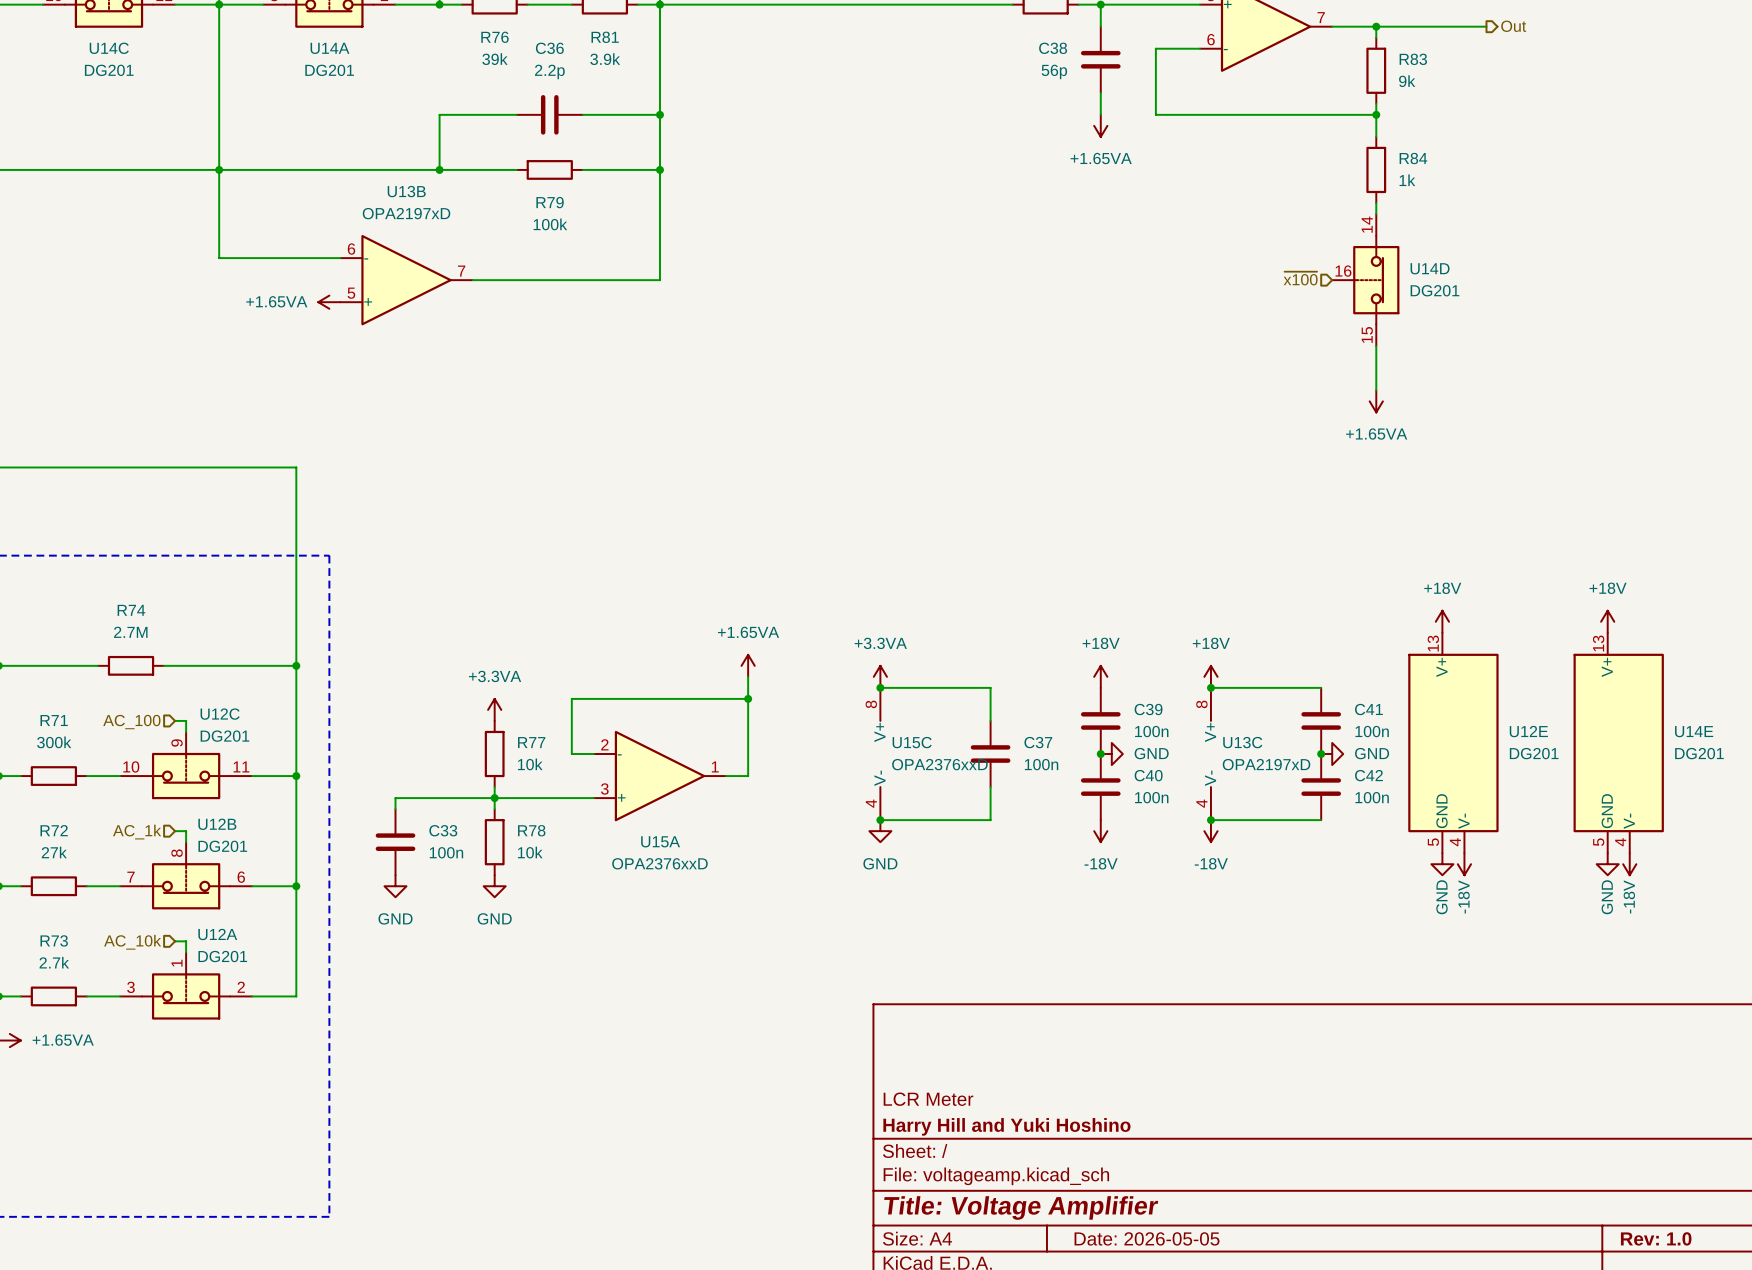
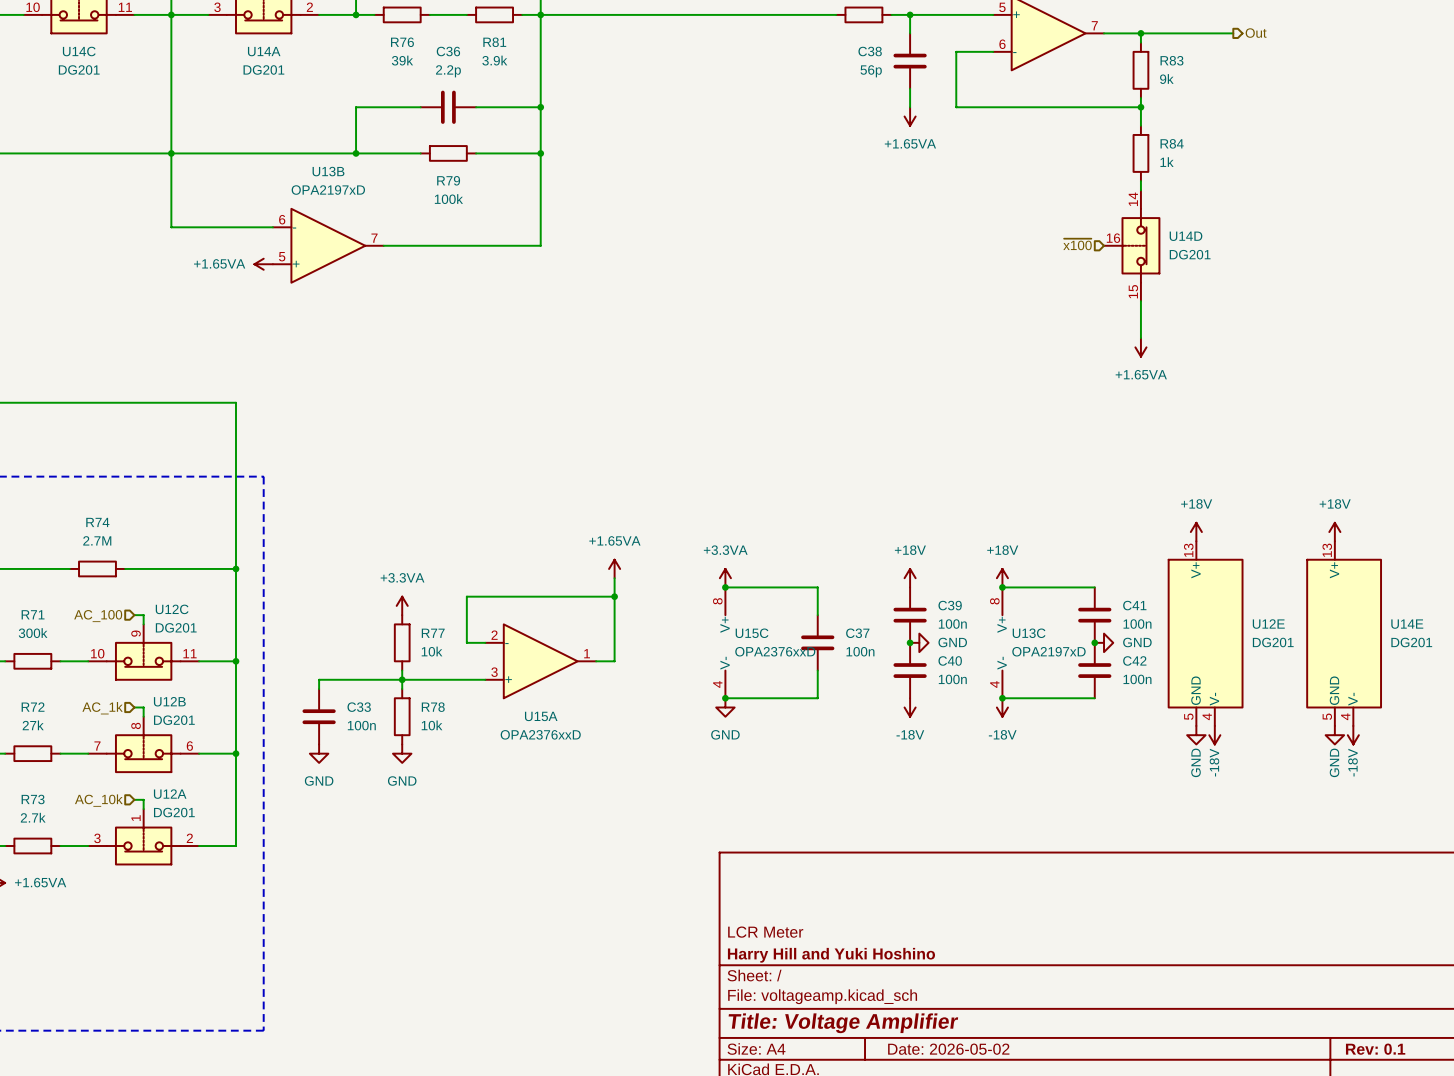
title block: Date: 2026-05-05 (1147, 1238) -> Date: 2026-05-02 (948, 1049)
title block: Rev: 1.0 (1656, 1238) -> Rev: 0.1 (1375, 1049)

